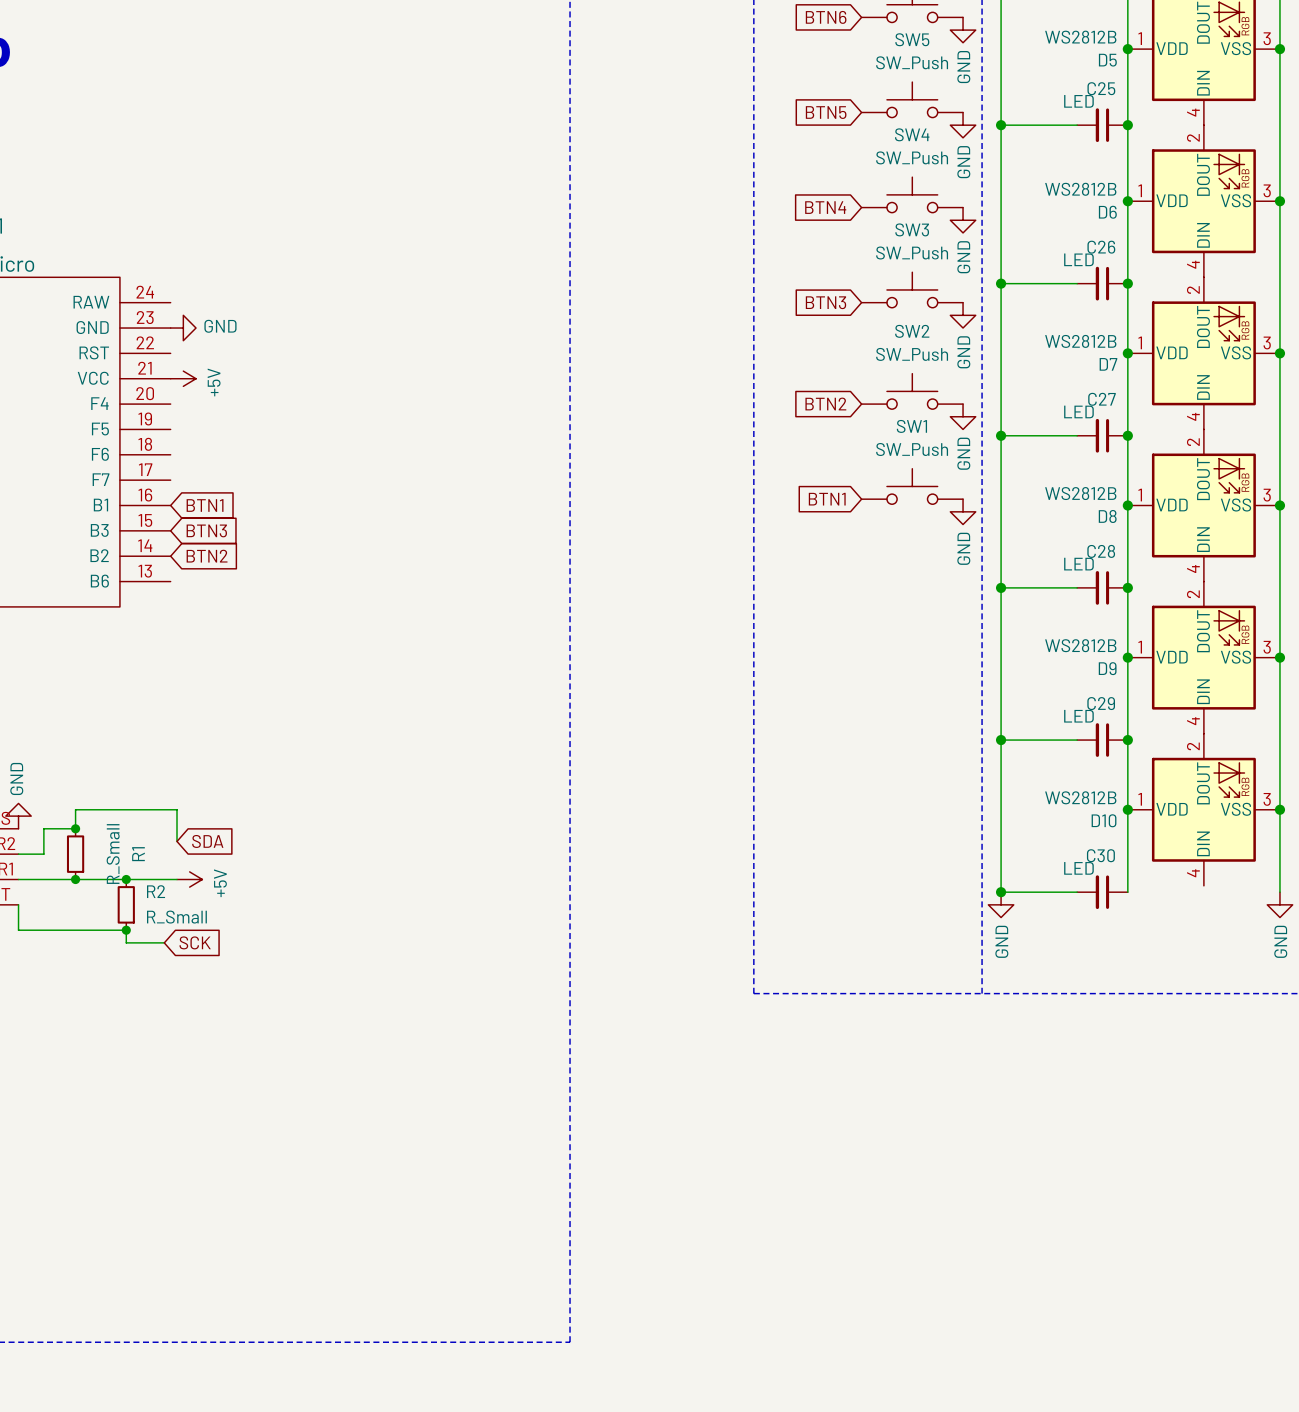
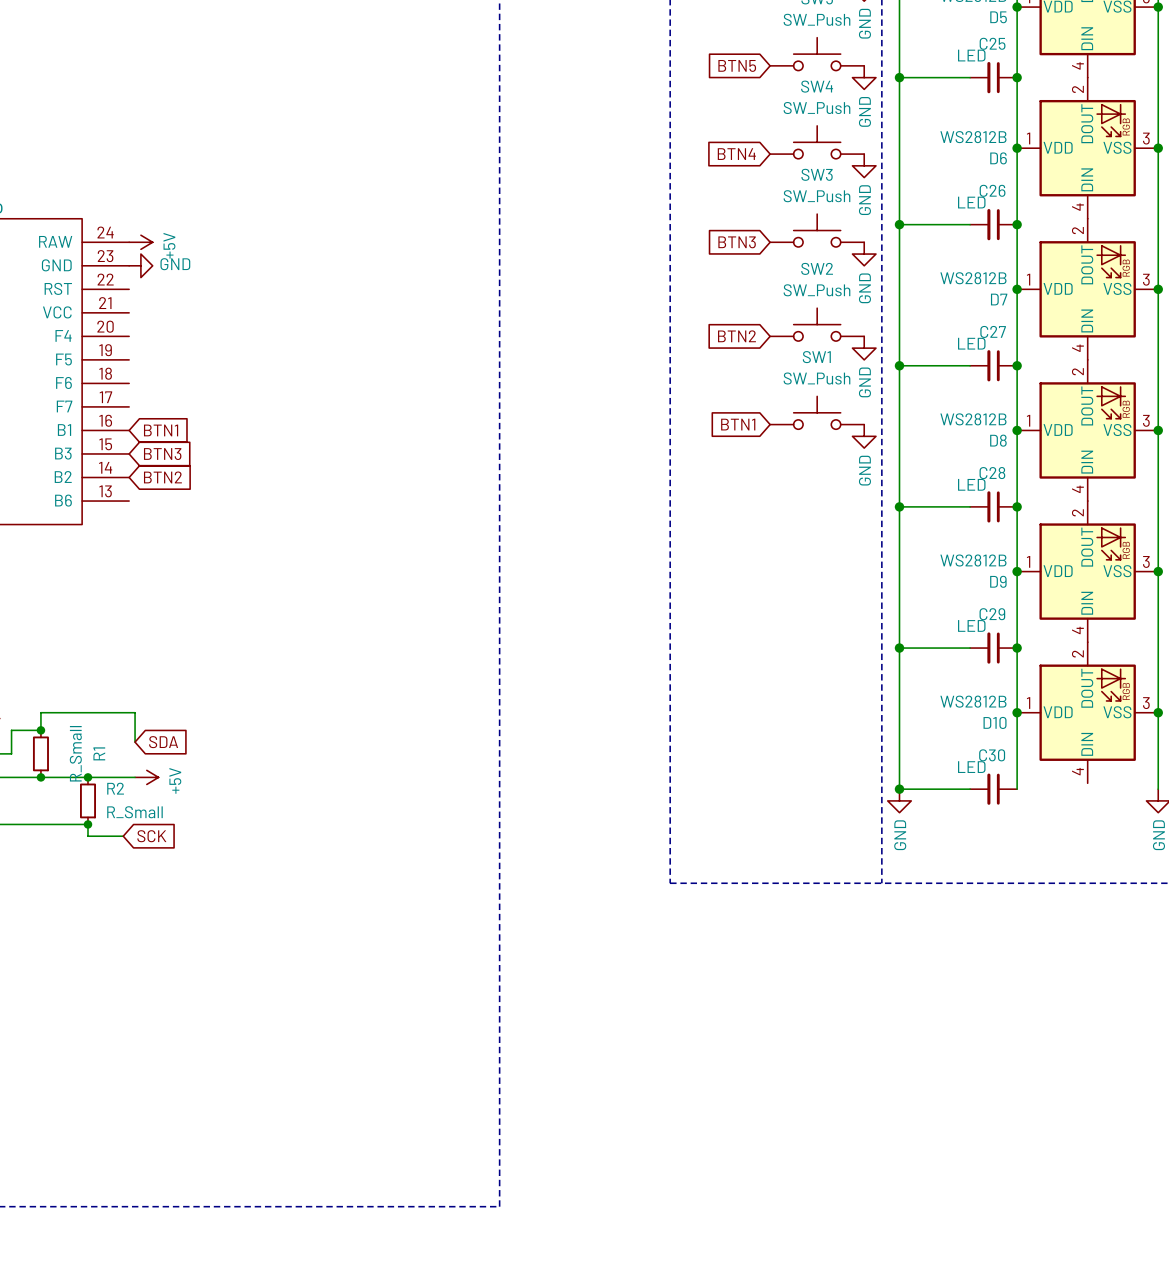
power symbol position: +5V (183, 378) -> +5V (140, 242)

